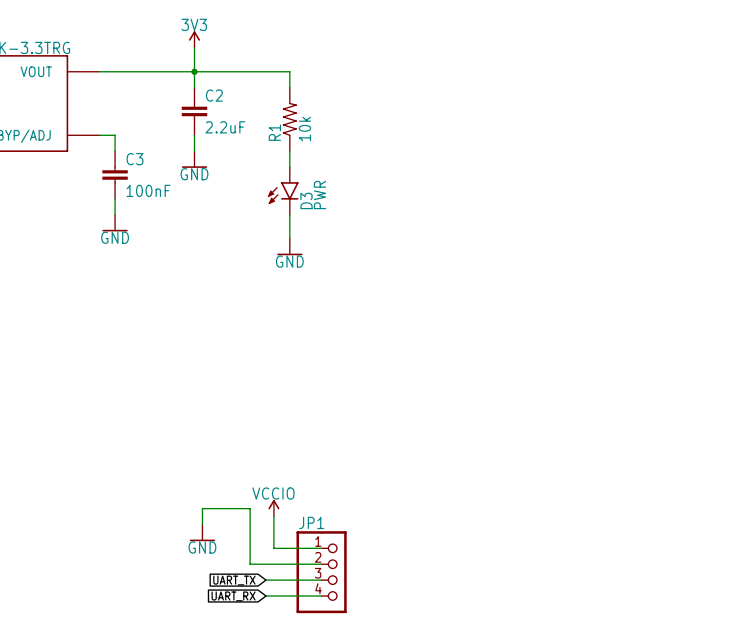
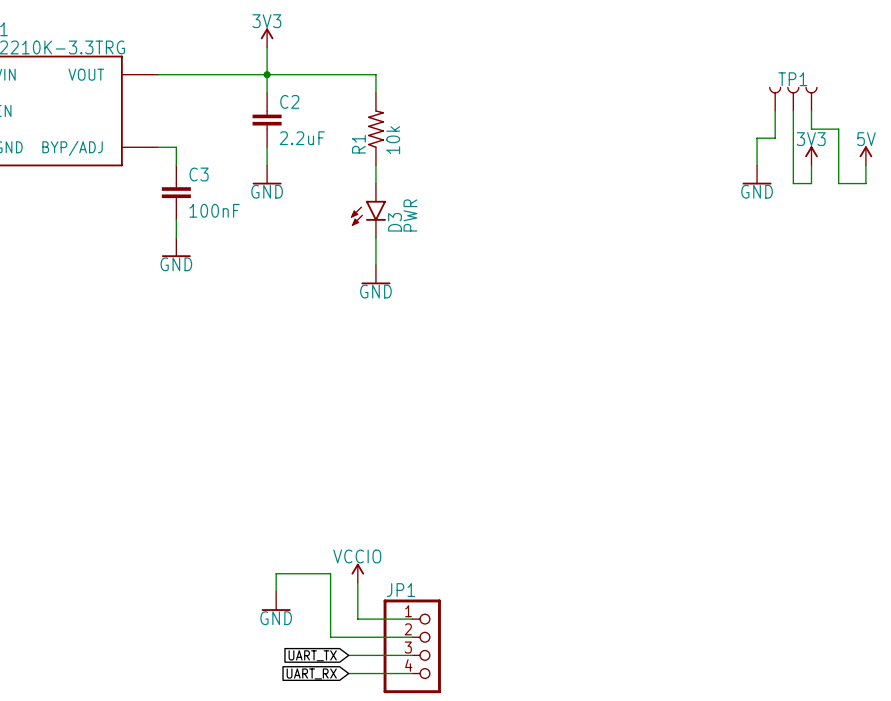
TP1: none -> (793, 99)
wire: none -> (775, 110) (775, 138) (757, 138) (757, 165)
wire: none -> (793, 110) (793, 183) (811, 183) (811, 165)
wire: none -> (811, 110) (811, 129) (838, 129) (838, 183) (865, 183) (865, 165)
power symbol: none -> 3V3 (811, 155)
power symbol: none -> 5V (865, 155)
power symbol: none -> GND (757, 174)

